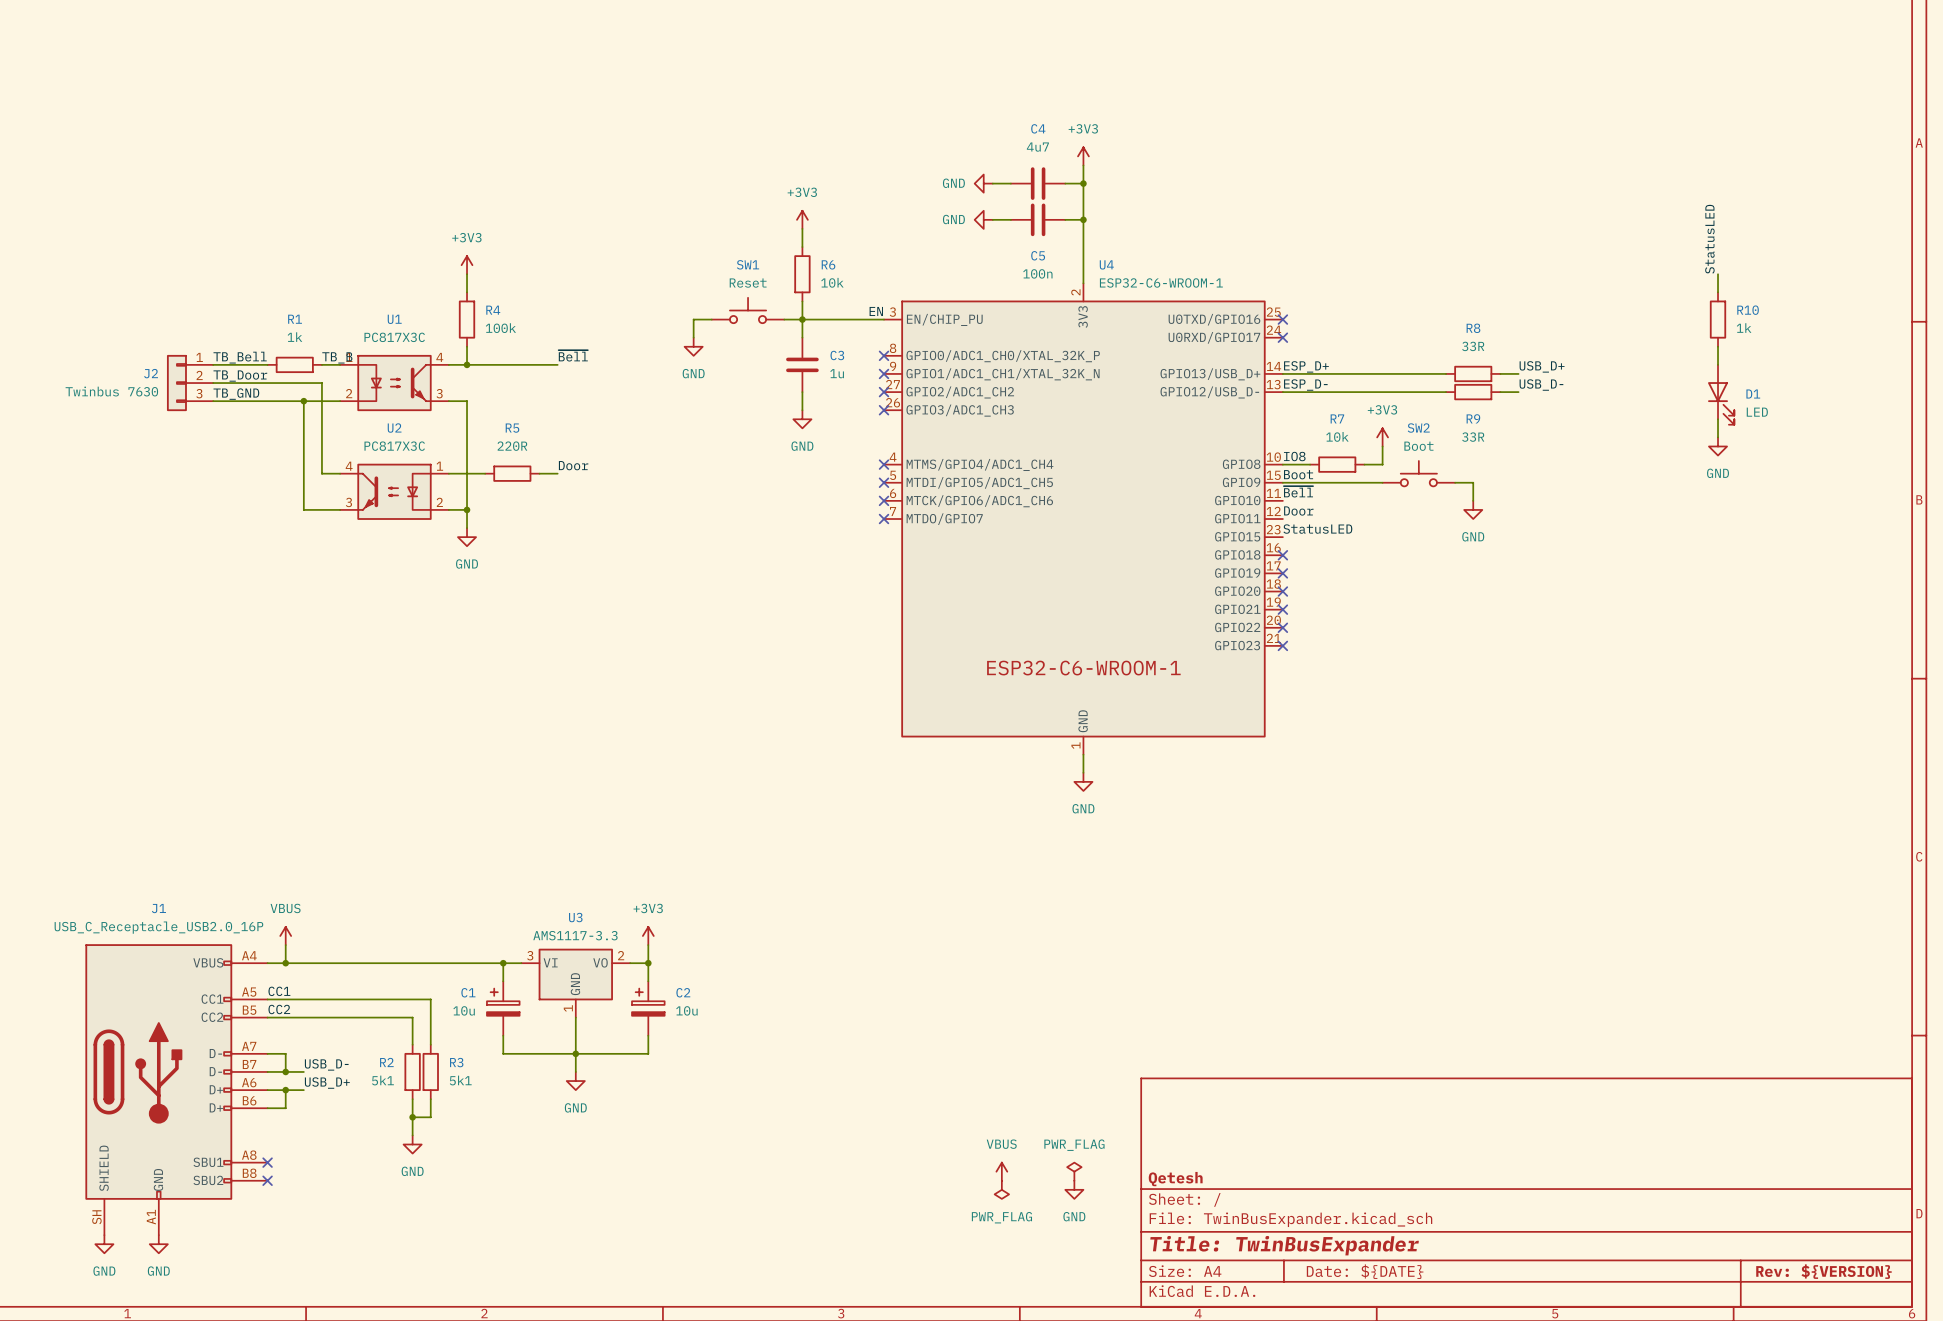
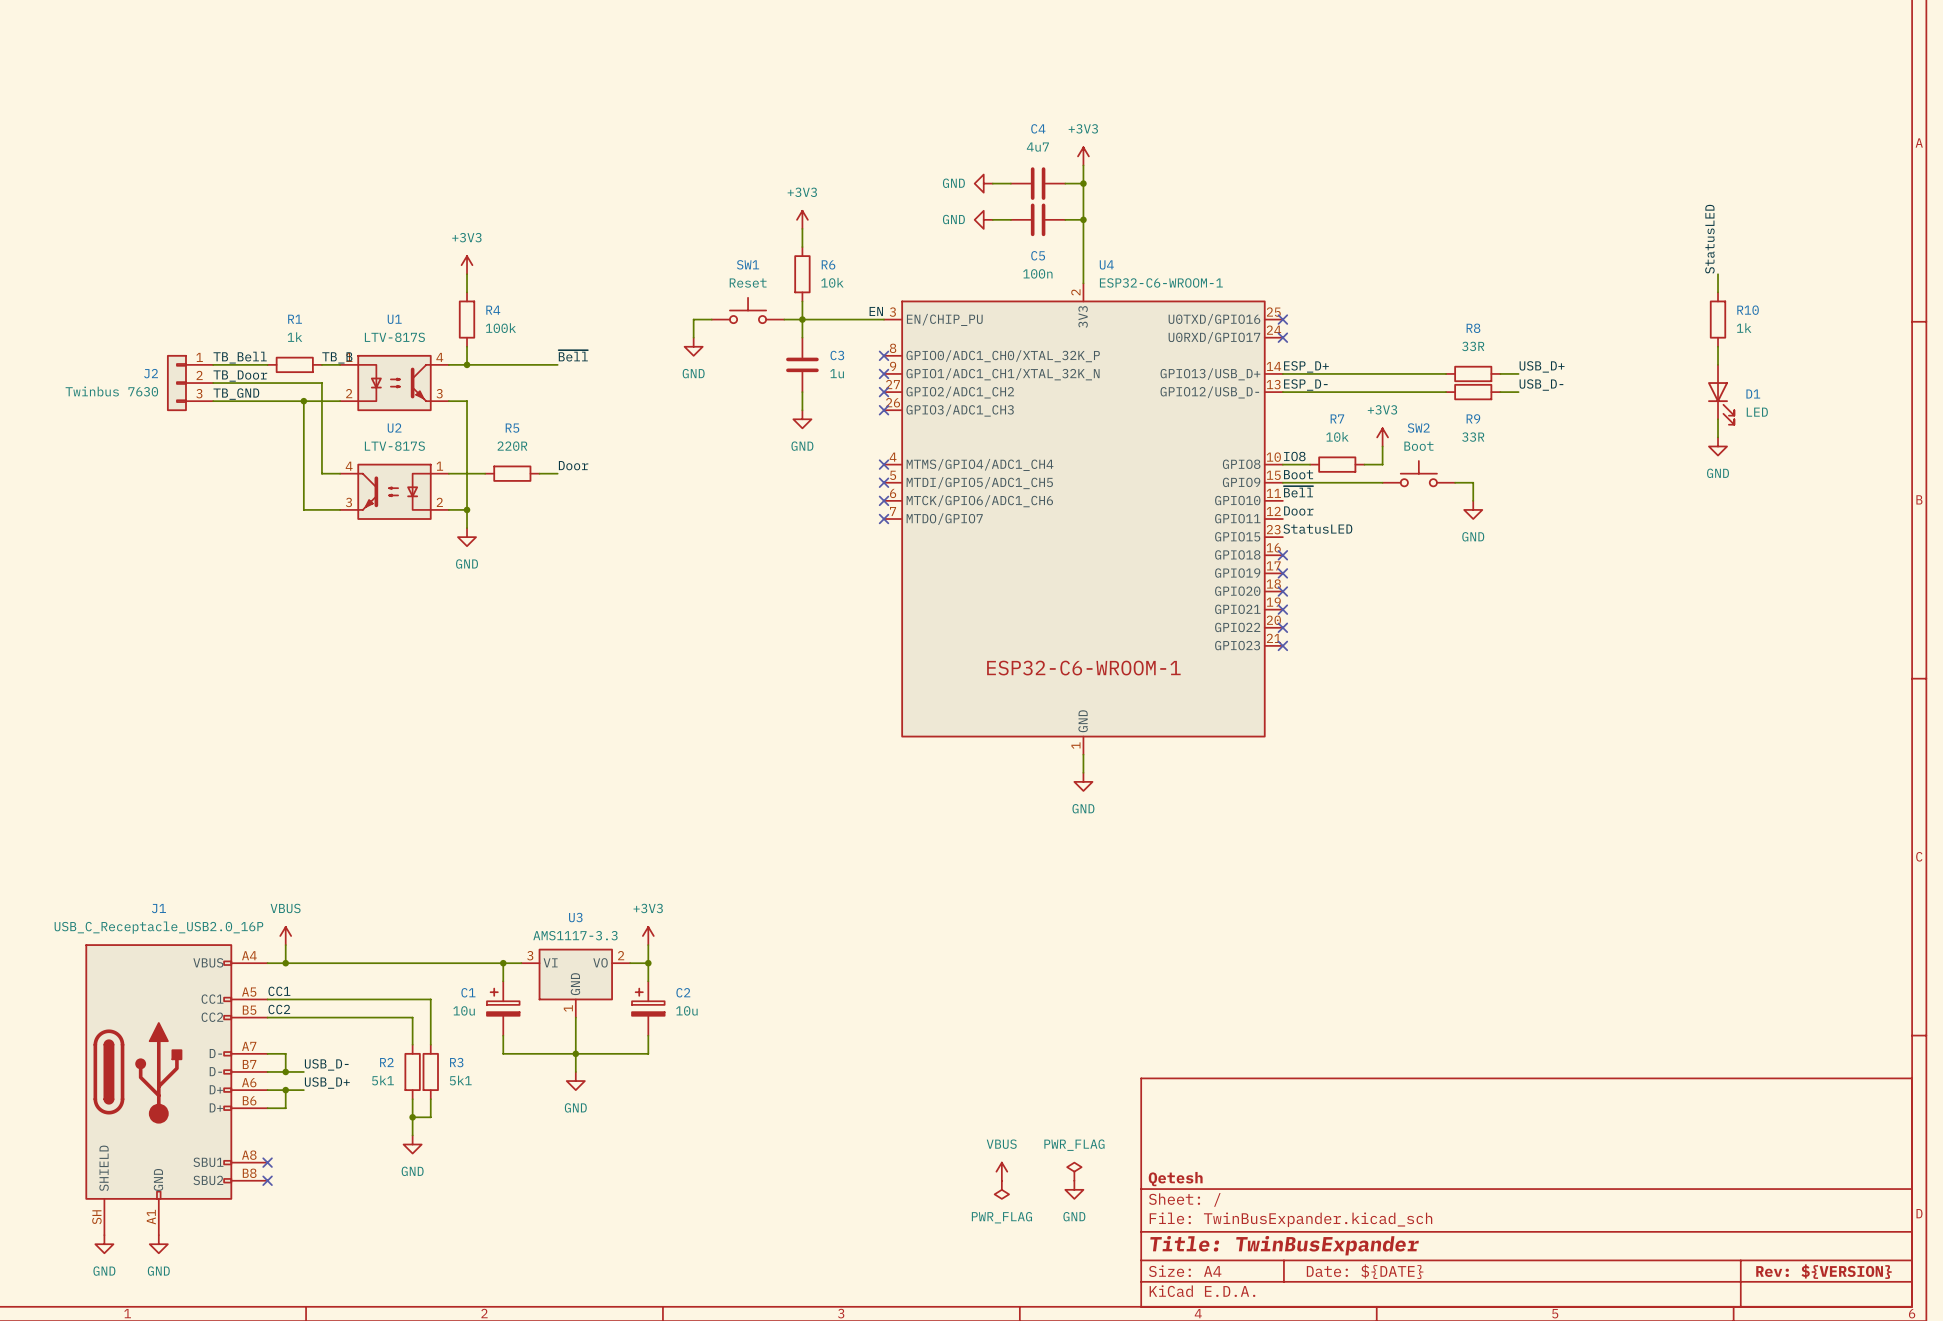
U1 value: PC817X3C (394, 337) -> LTV-817S (394, 337)
U2 value: PC817X3C (394, 446) -> LTV-817S (394, 446)

